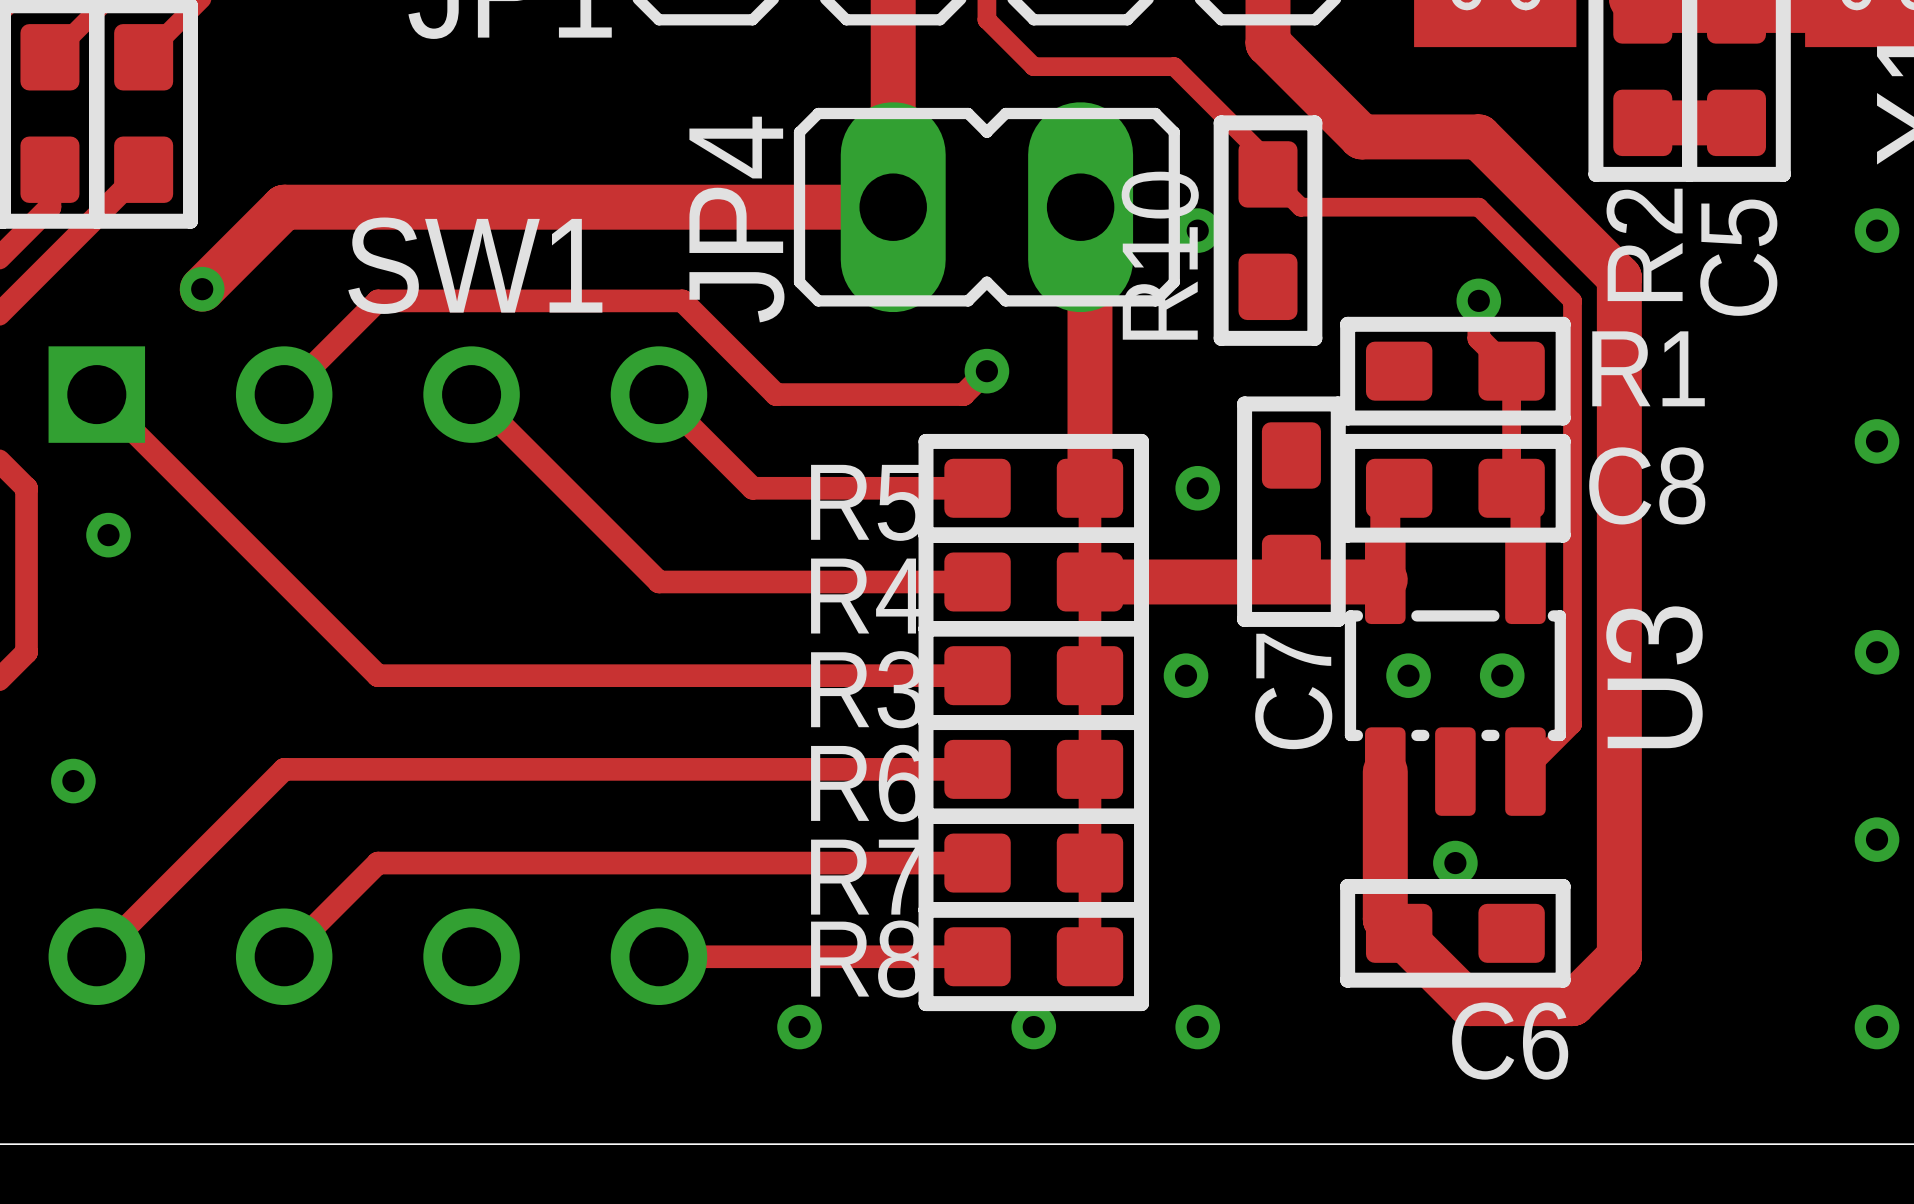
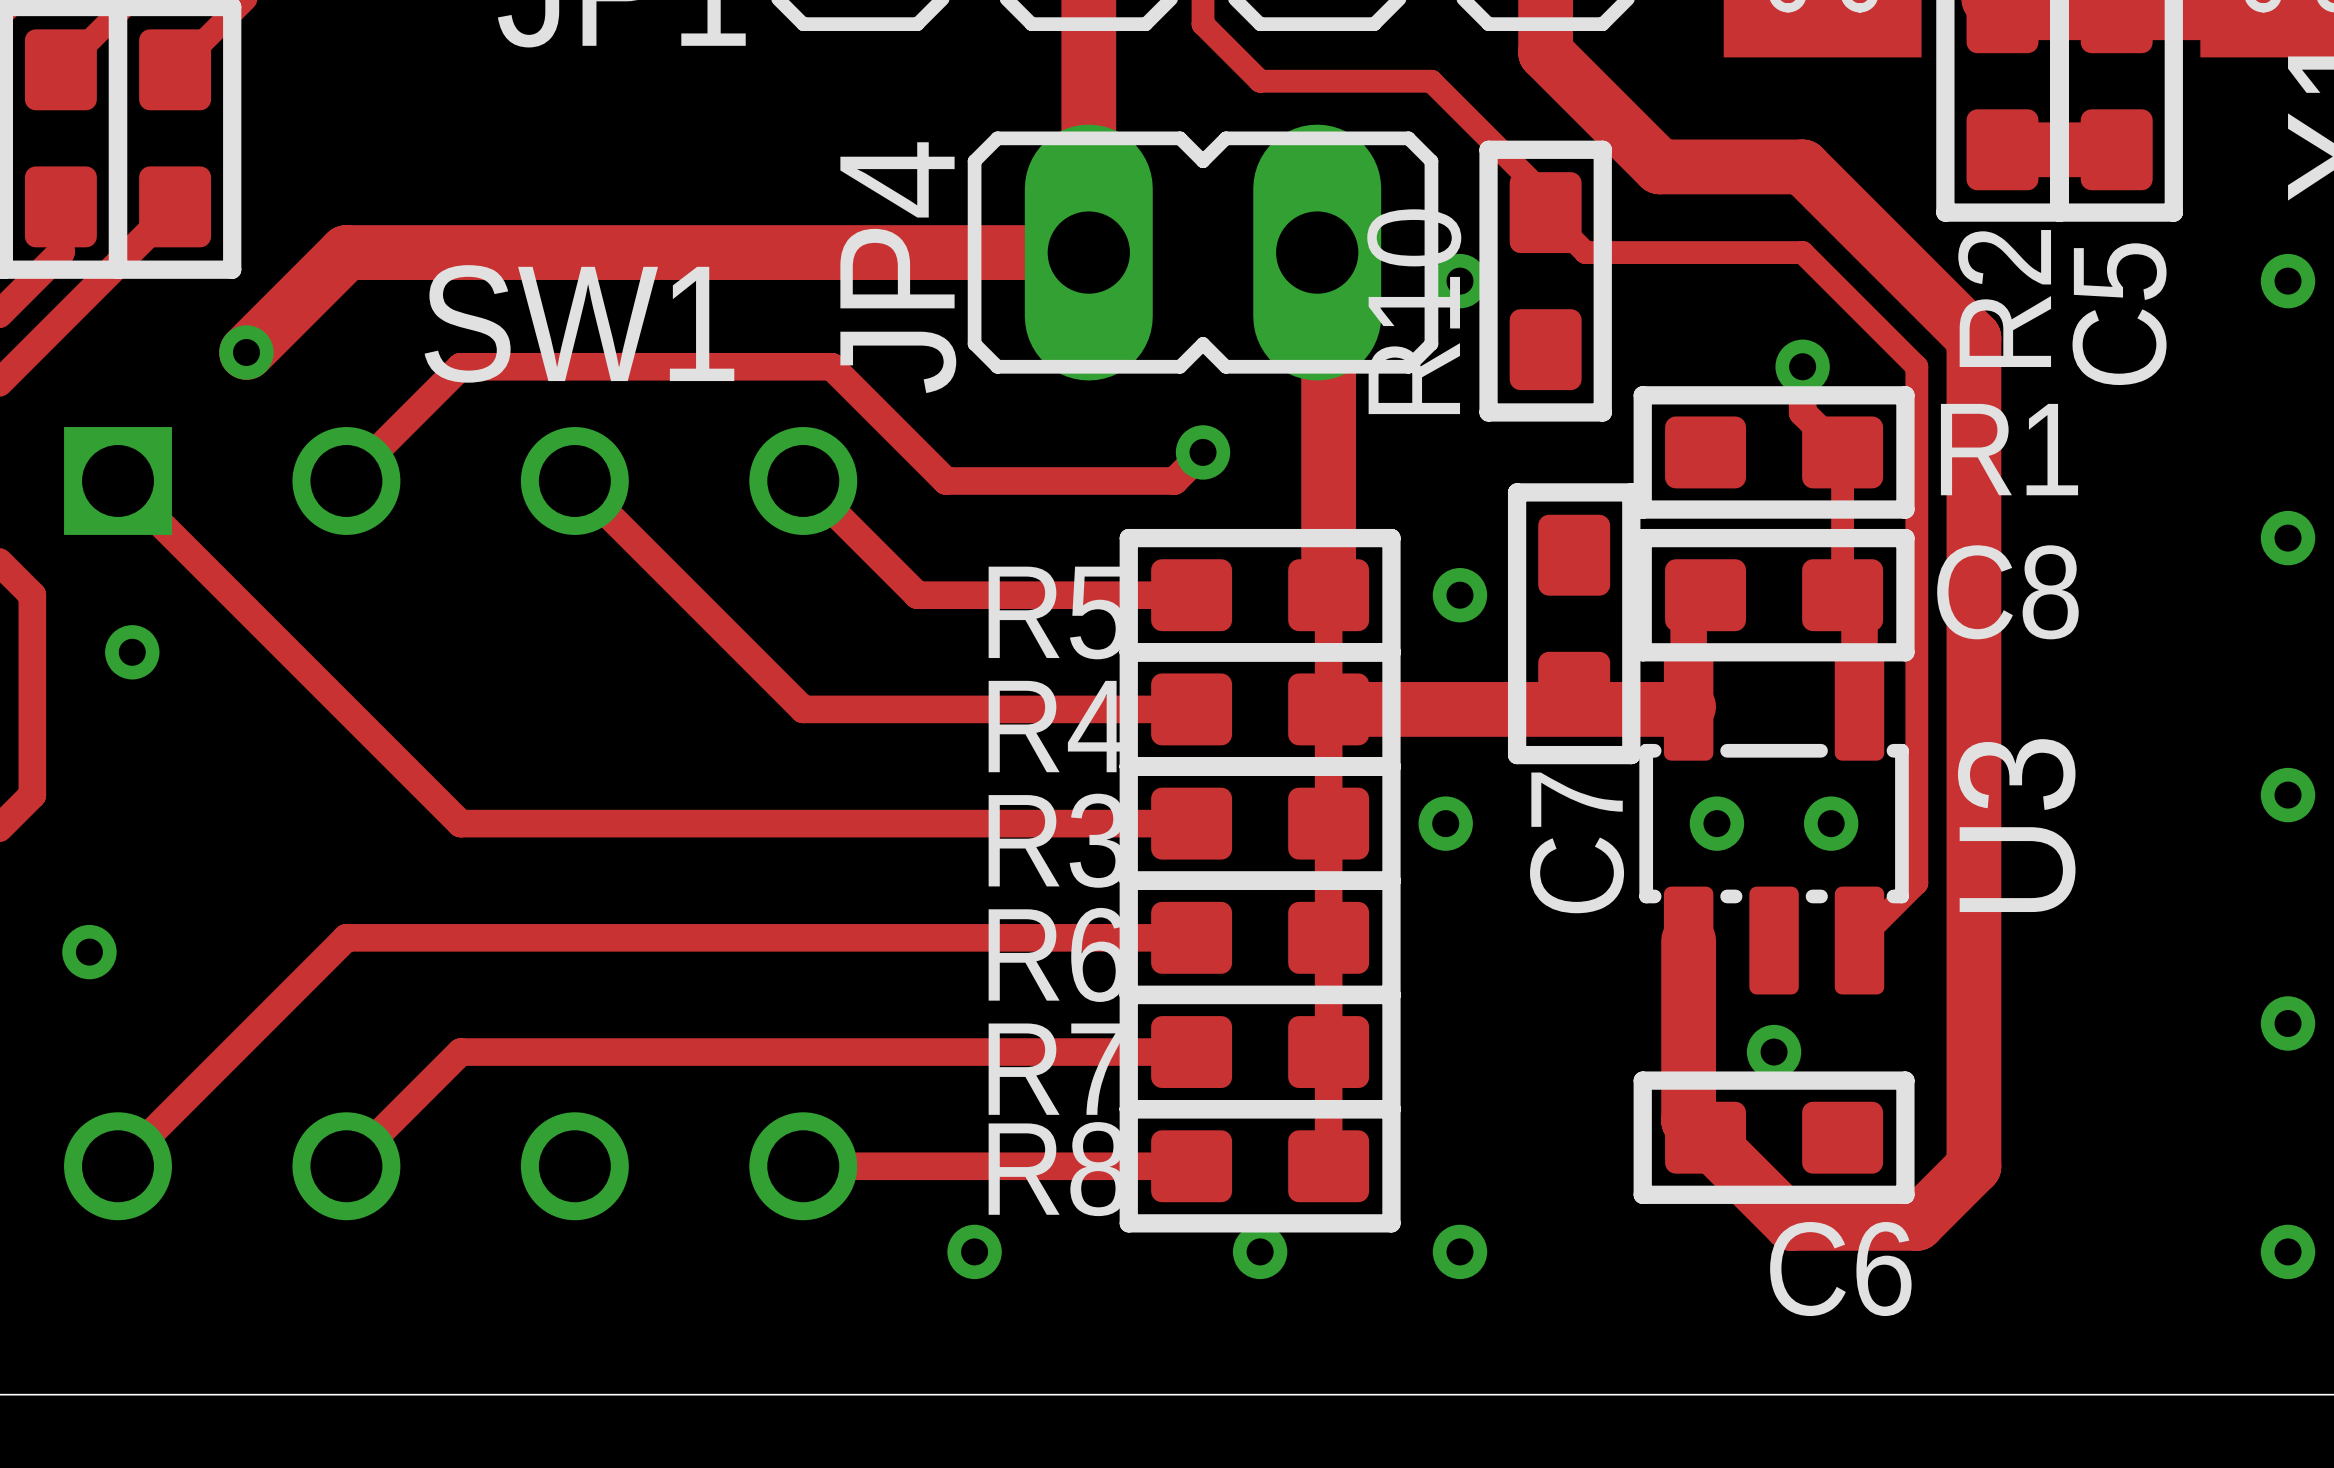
SW1 footprint: [48, 346, 708, 1006] -> [64, 427, 858, 1221]

